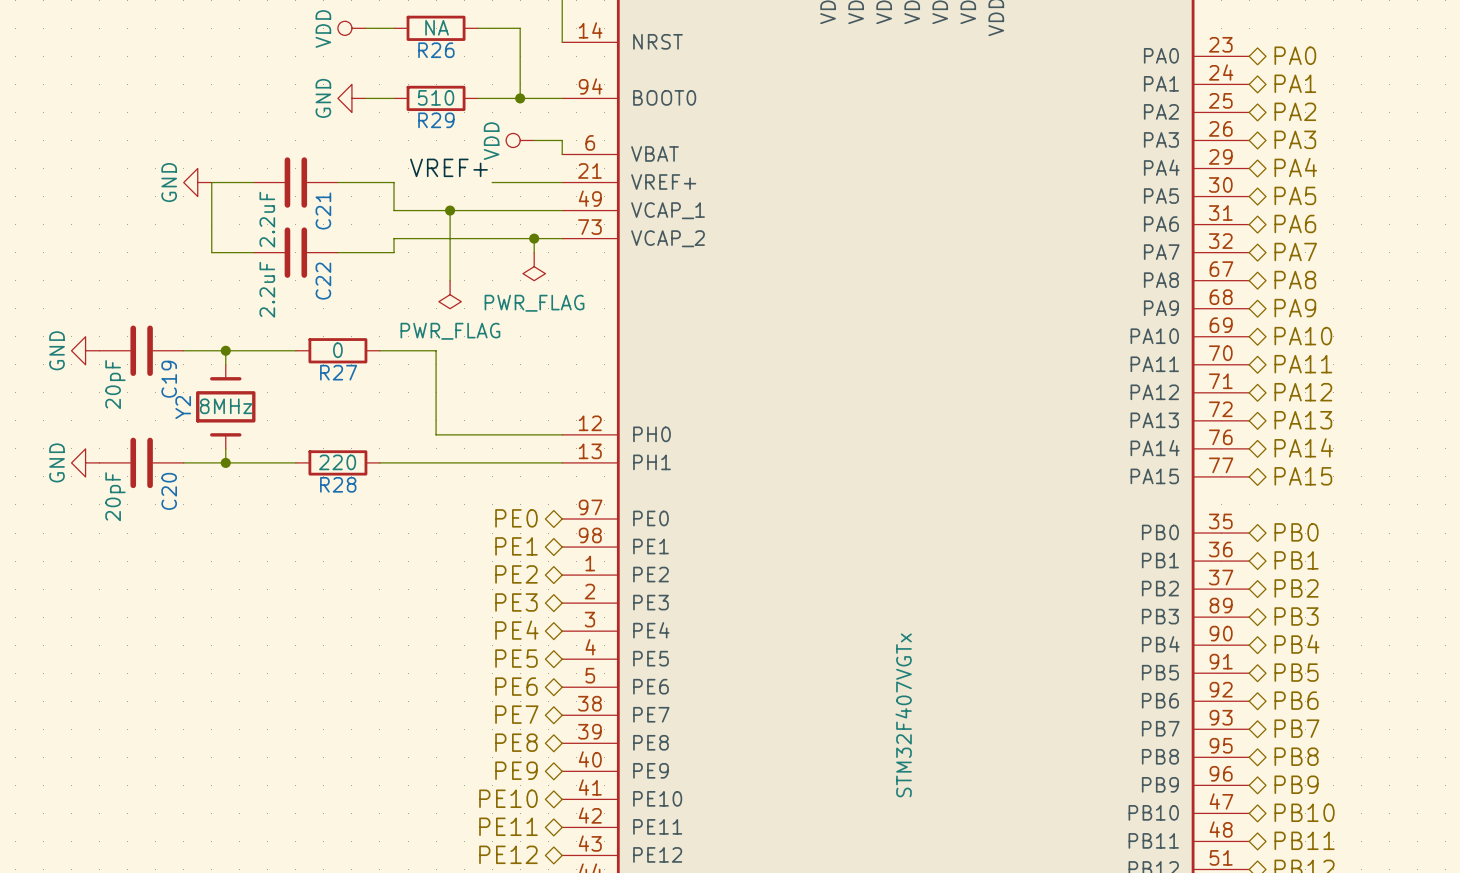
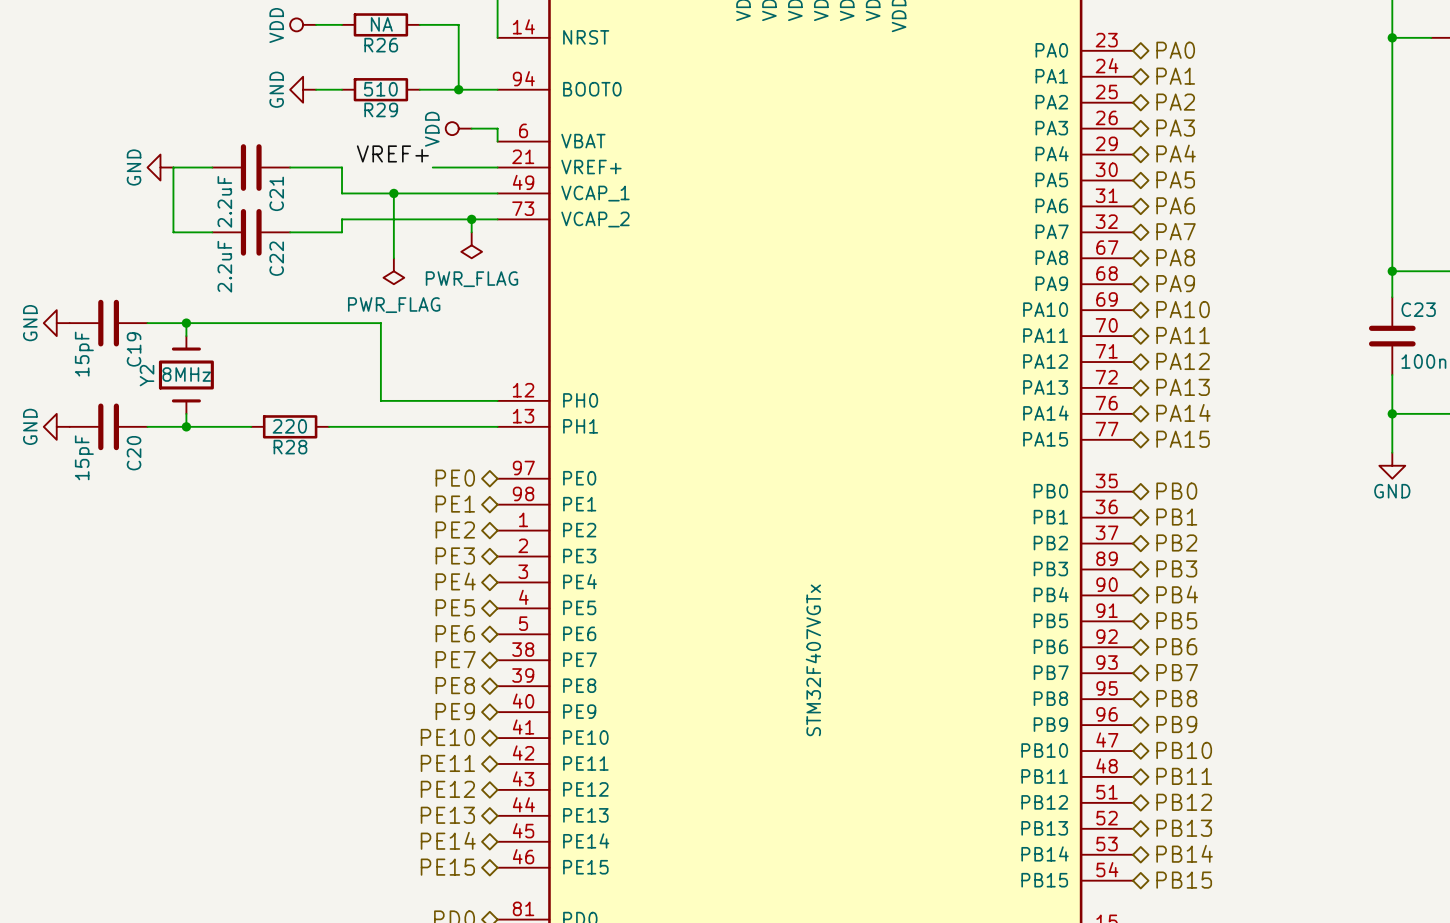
wire: none -> (251, 323) (329, 323)
R27: 0 (337, 350) -> none
C19 value: 20pF (115, 384) -> 15pF (84, 354)
C20 value: 20pF (115, 496) -> 15pF (84, 457)

